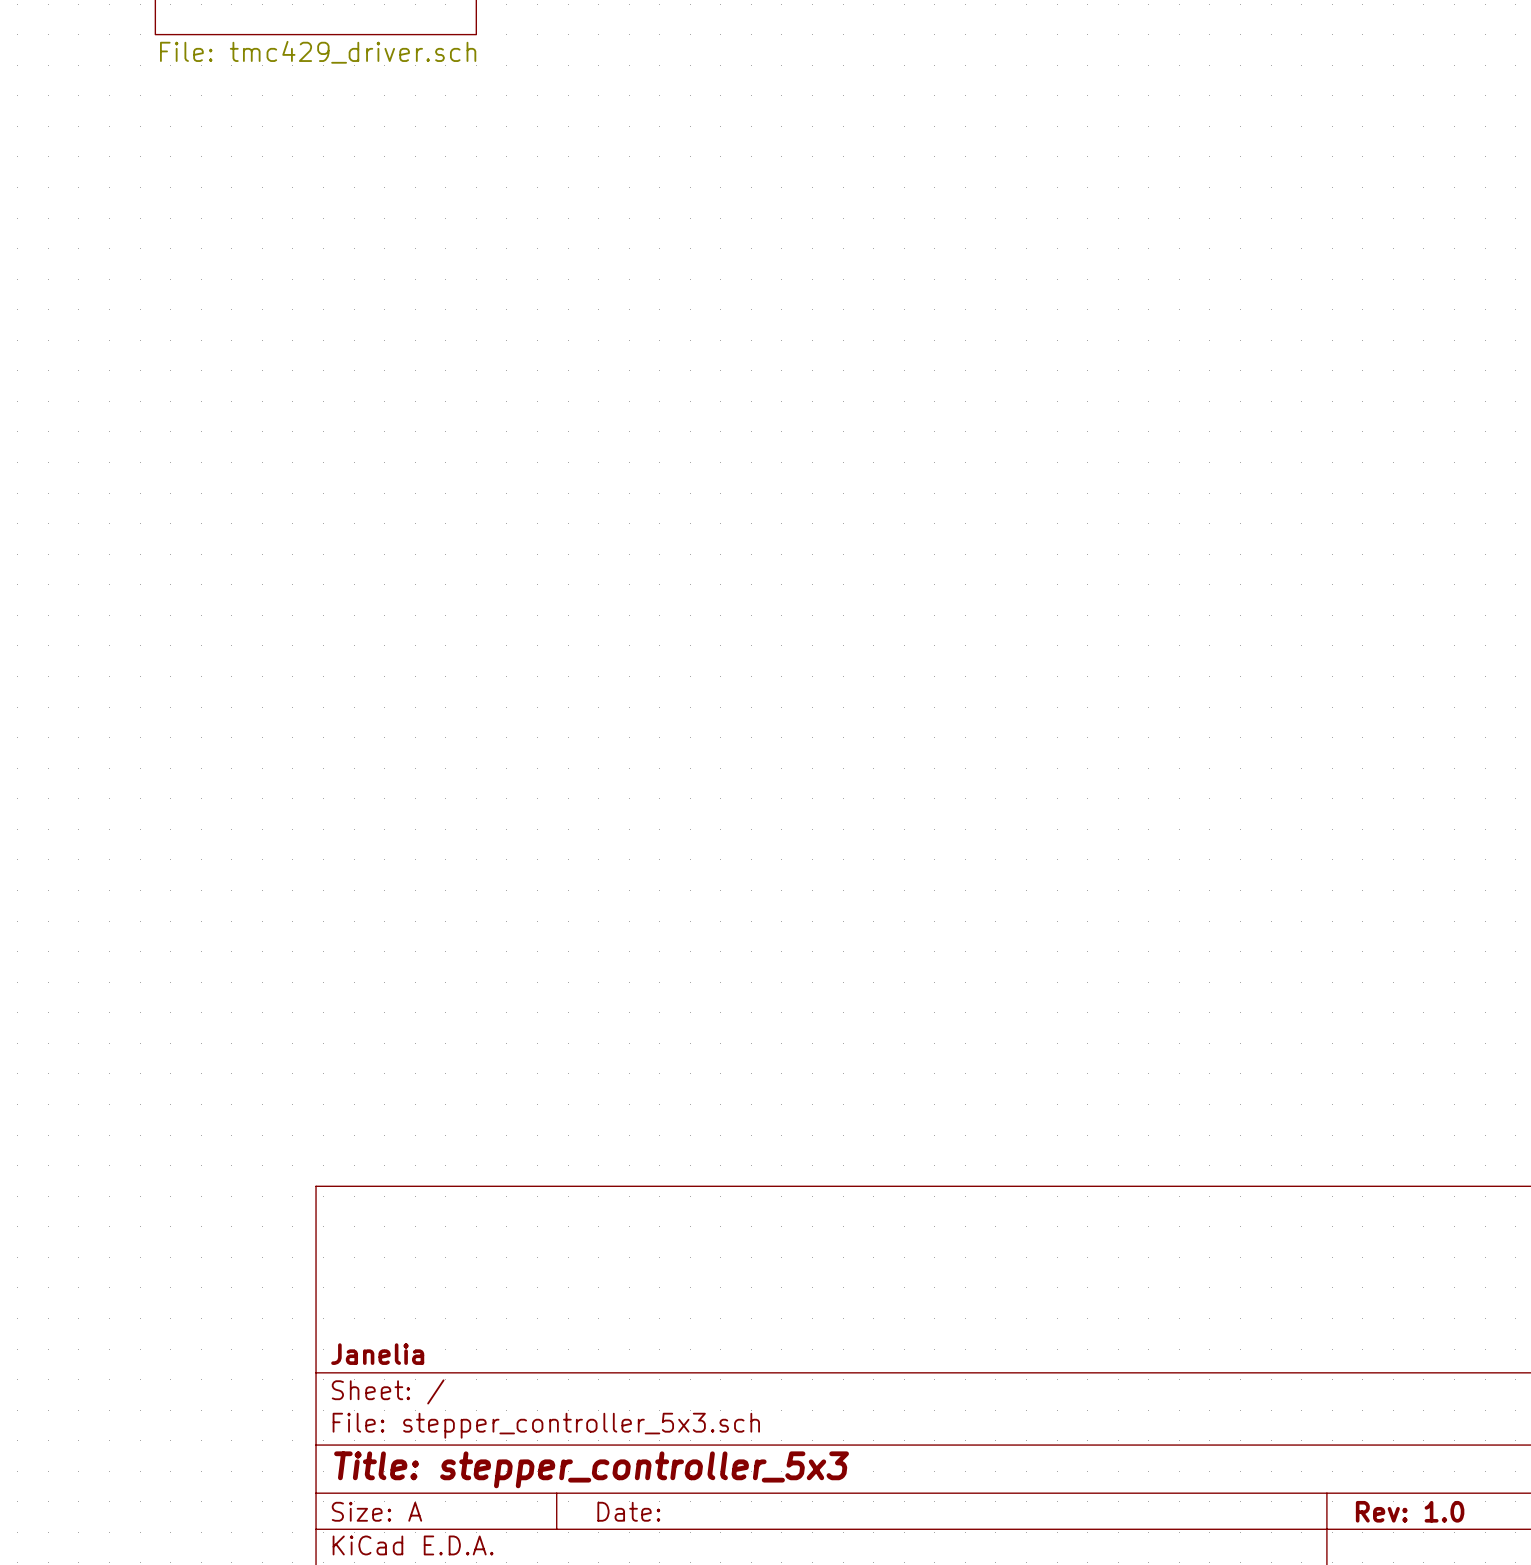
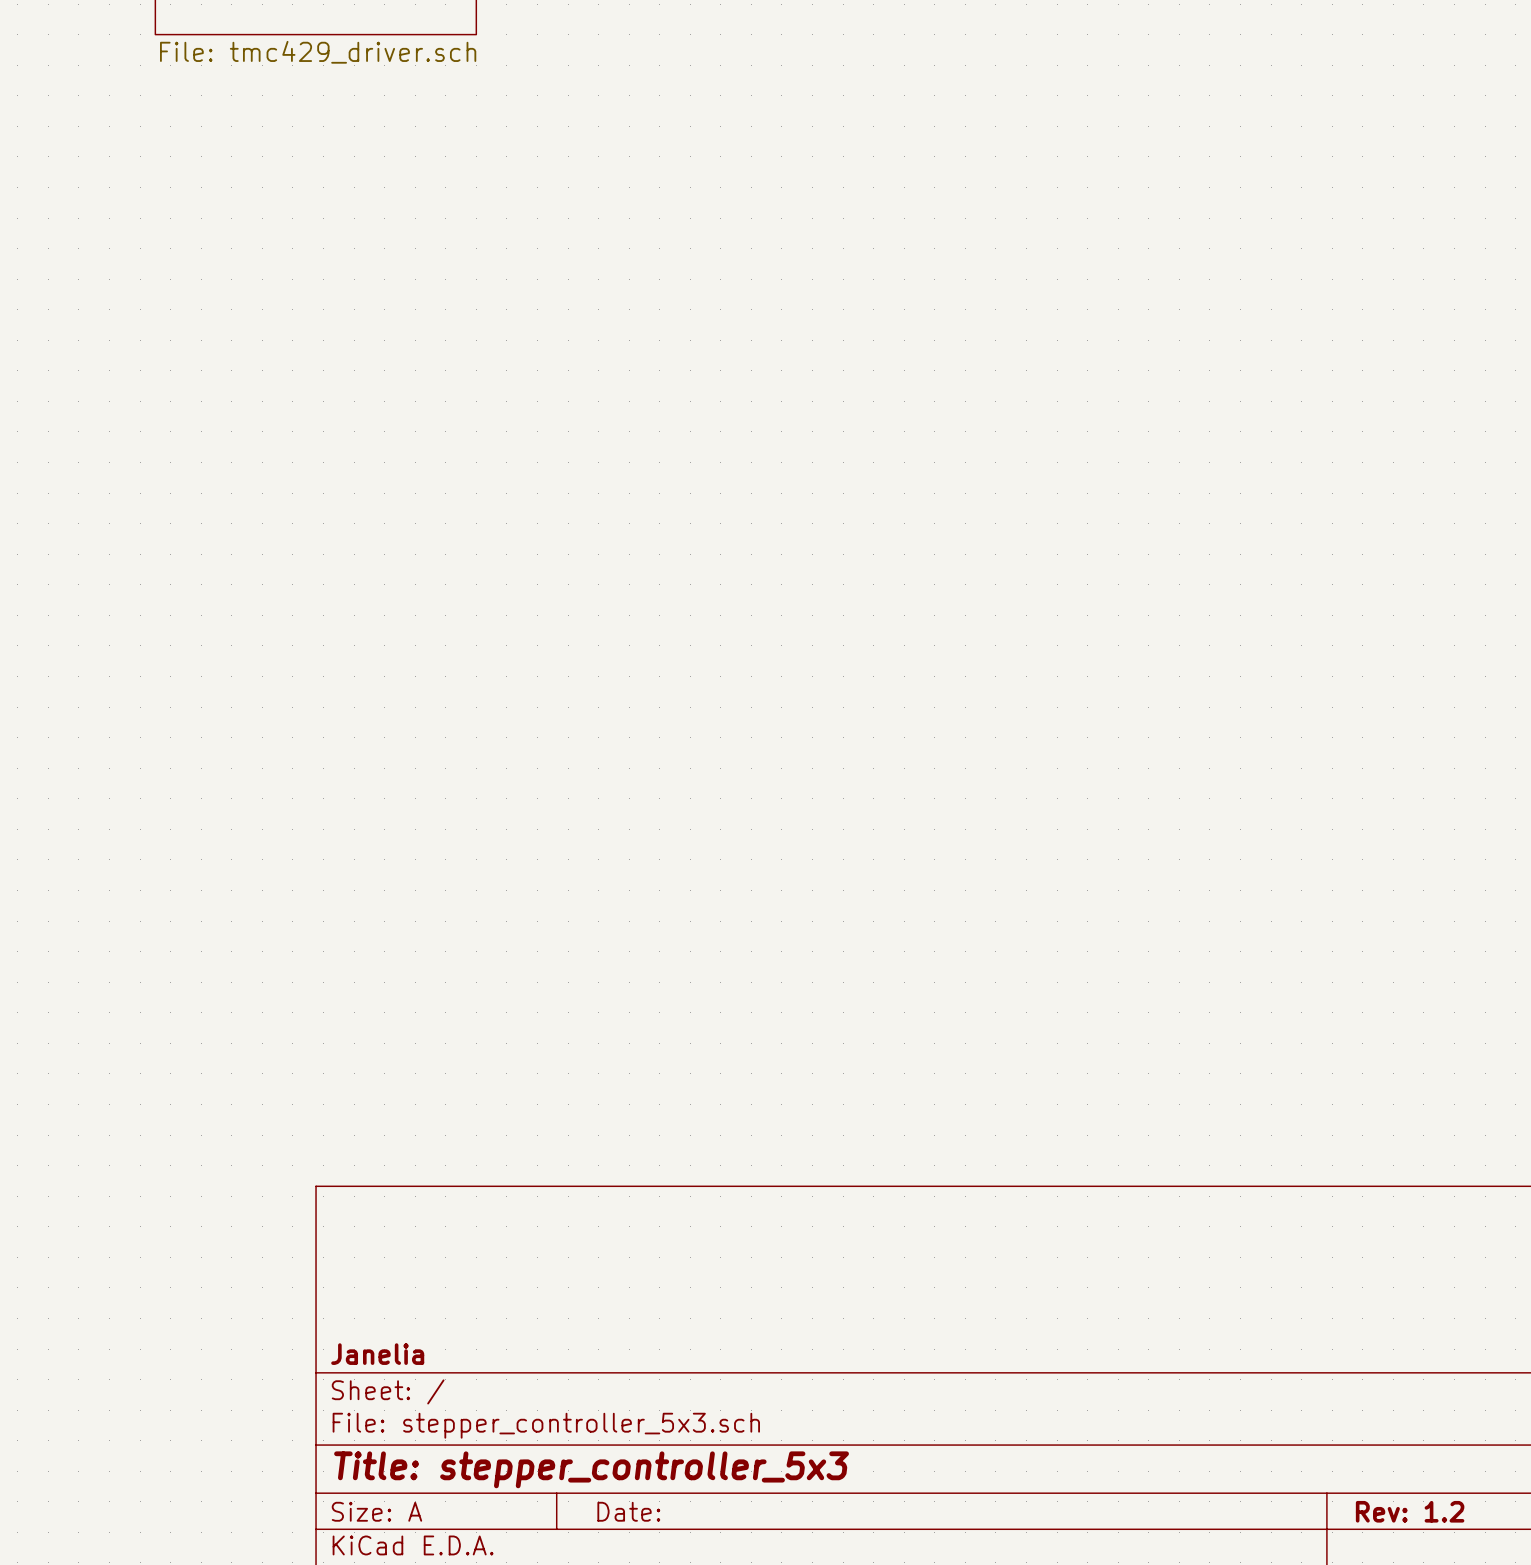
title block: Rev: 1.0 (1410, 1511) -> Rev: 1.2 (1410, 1511)

